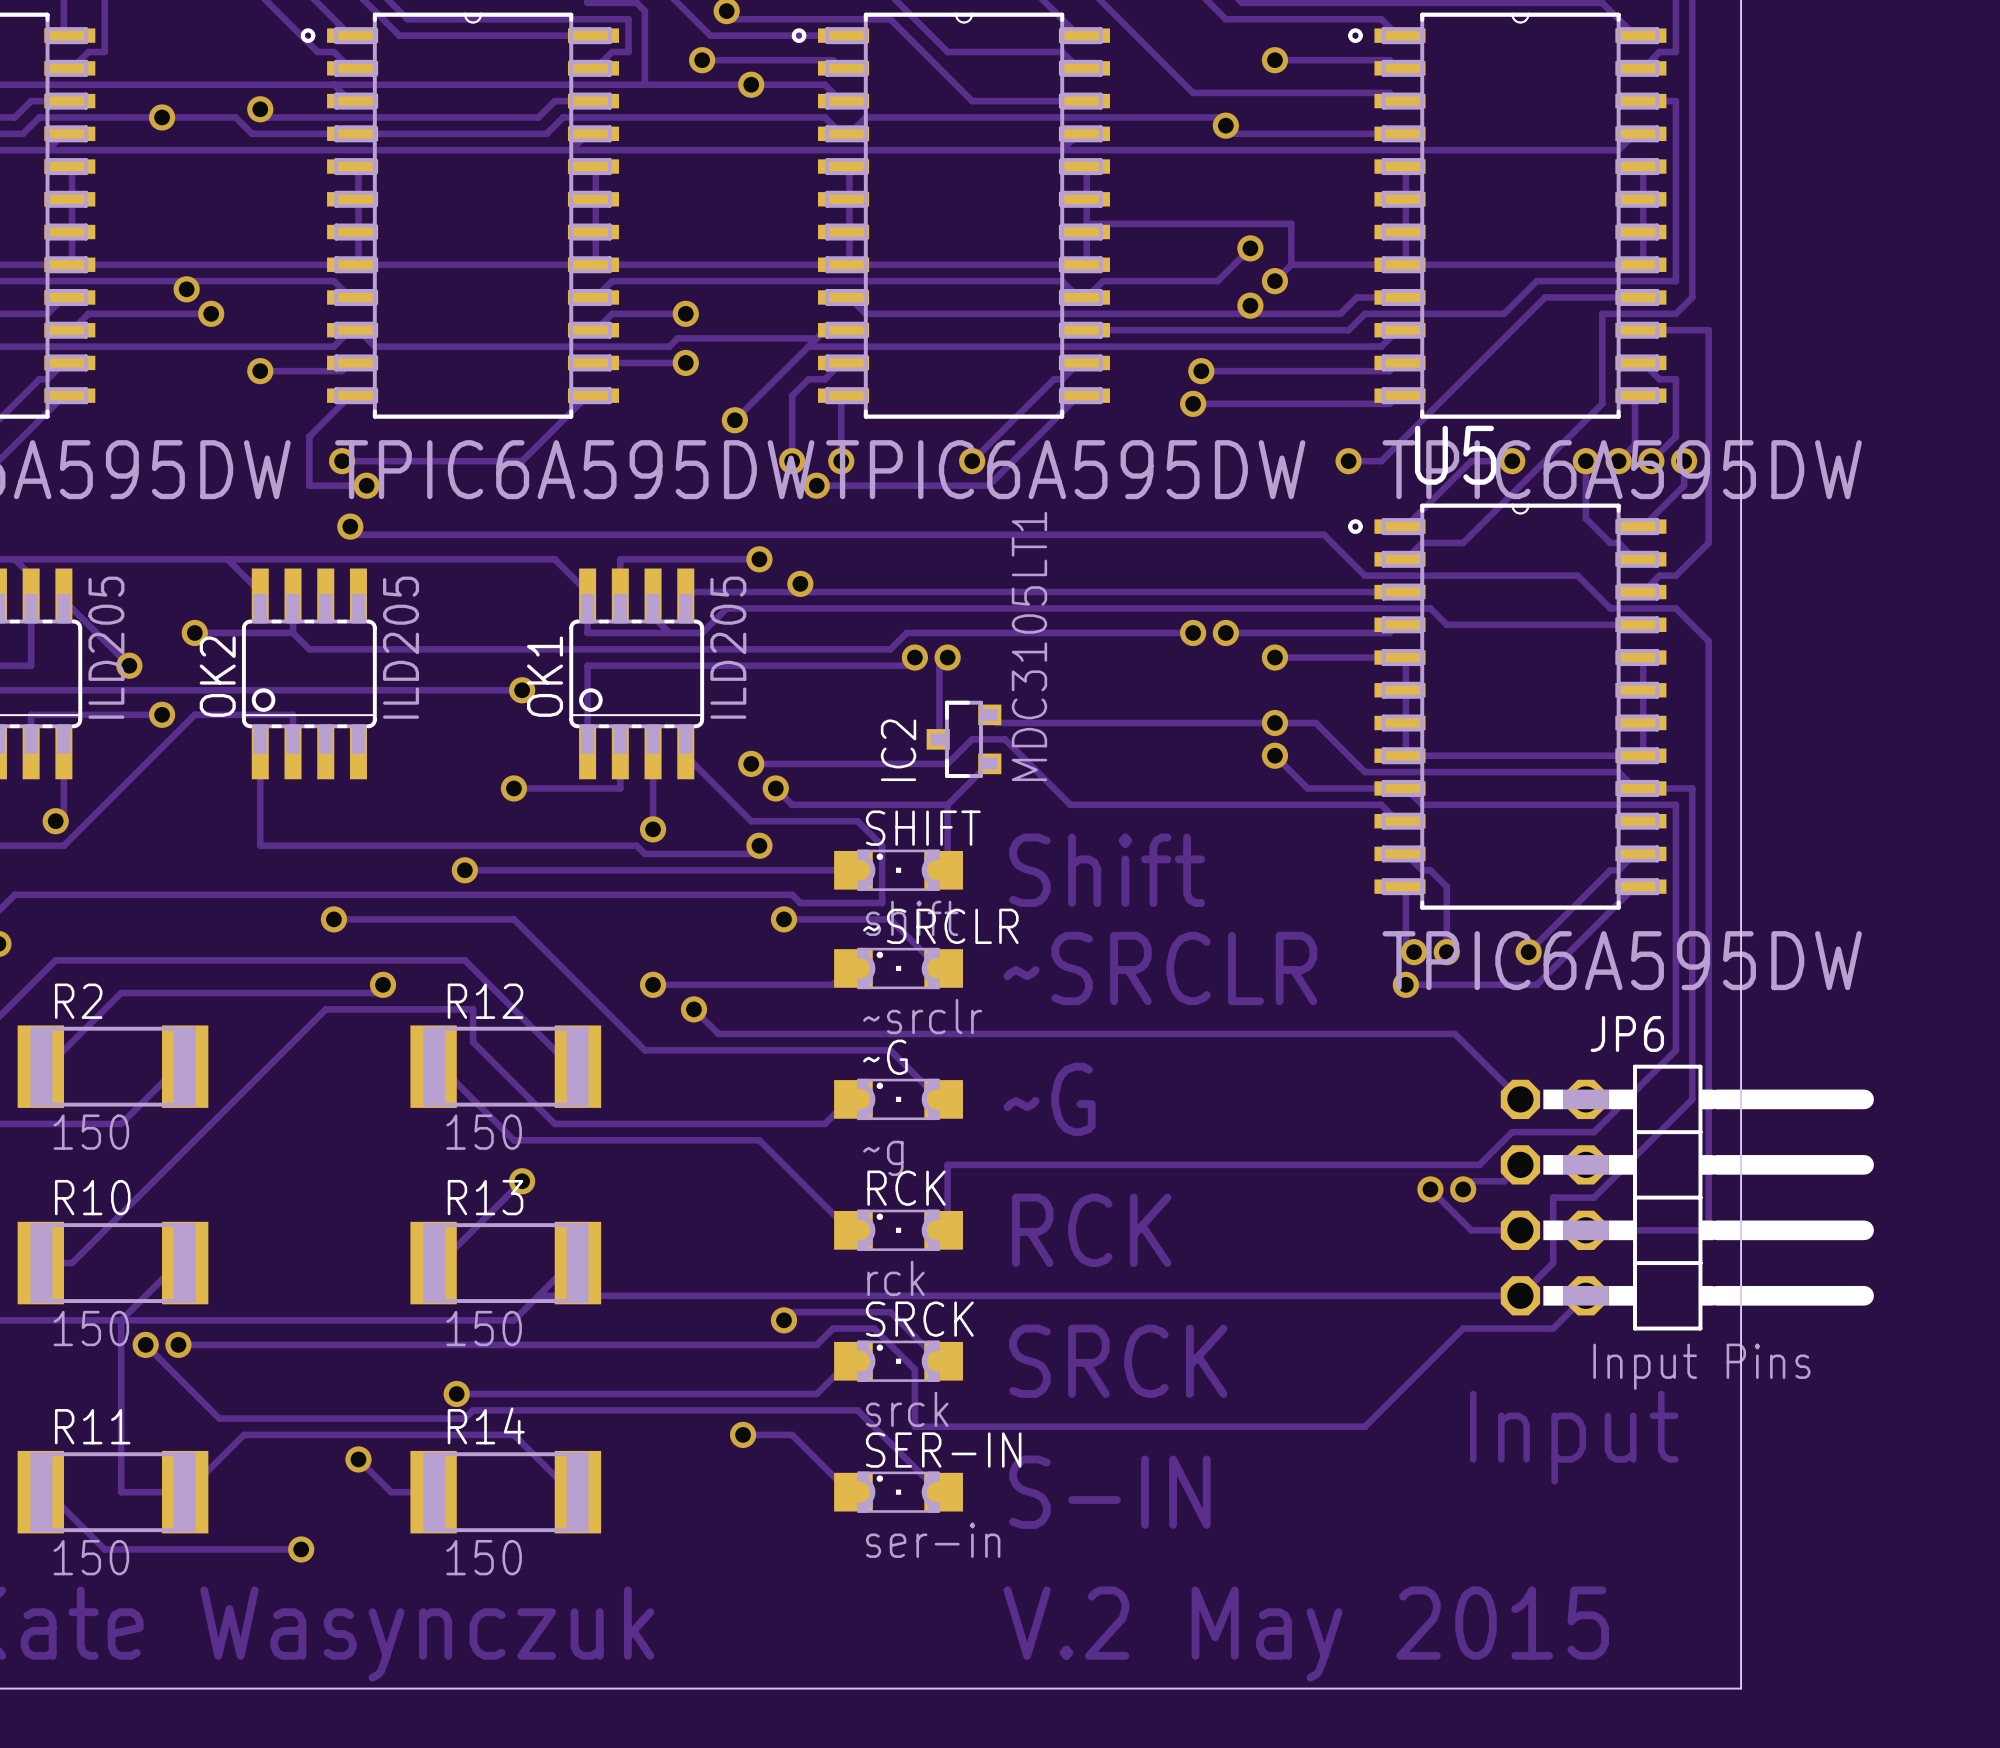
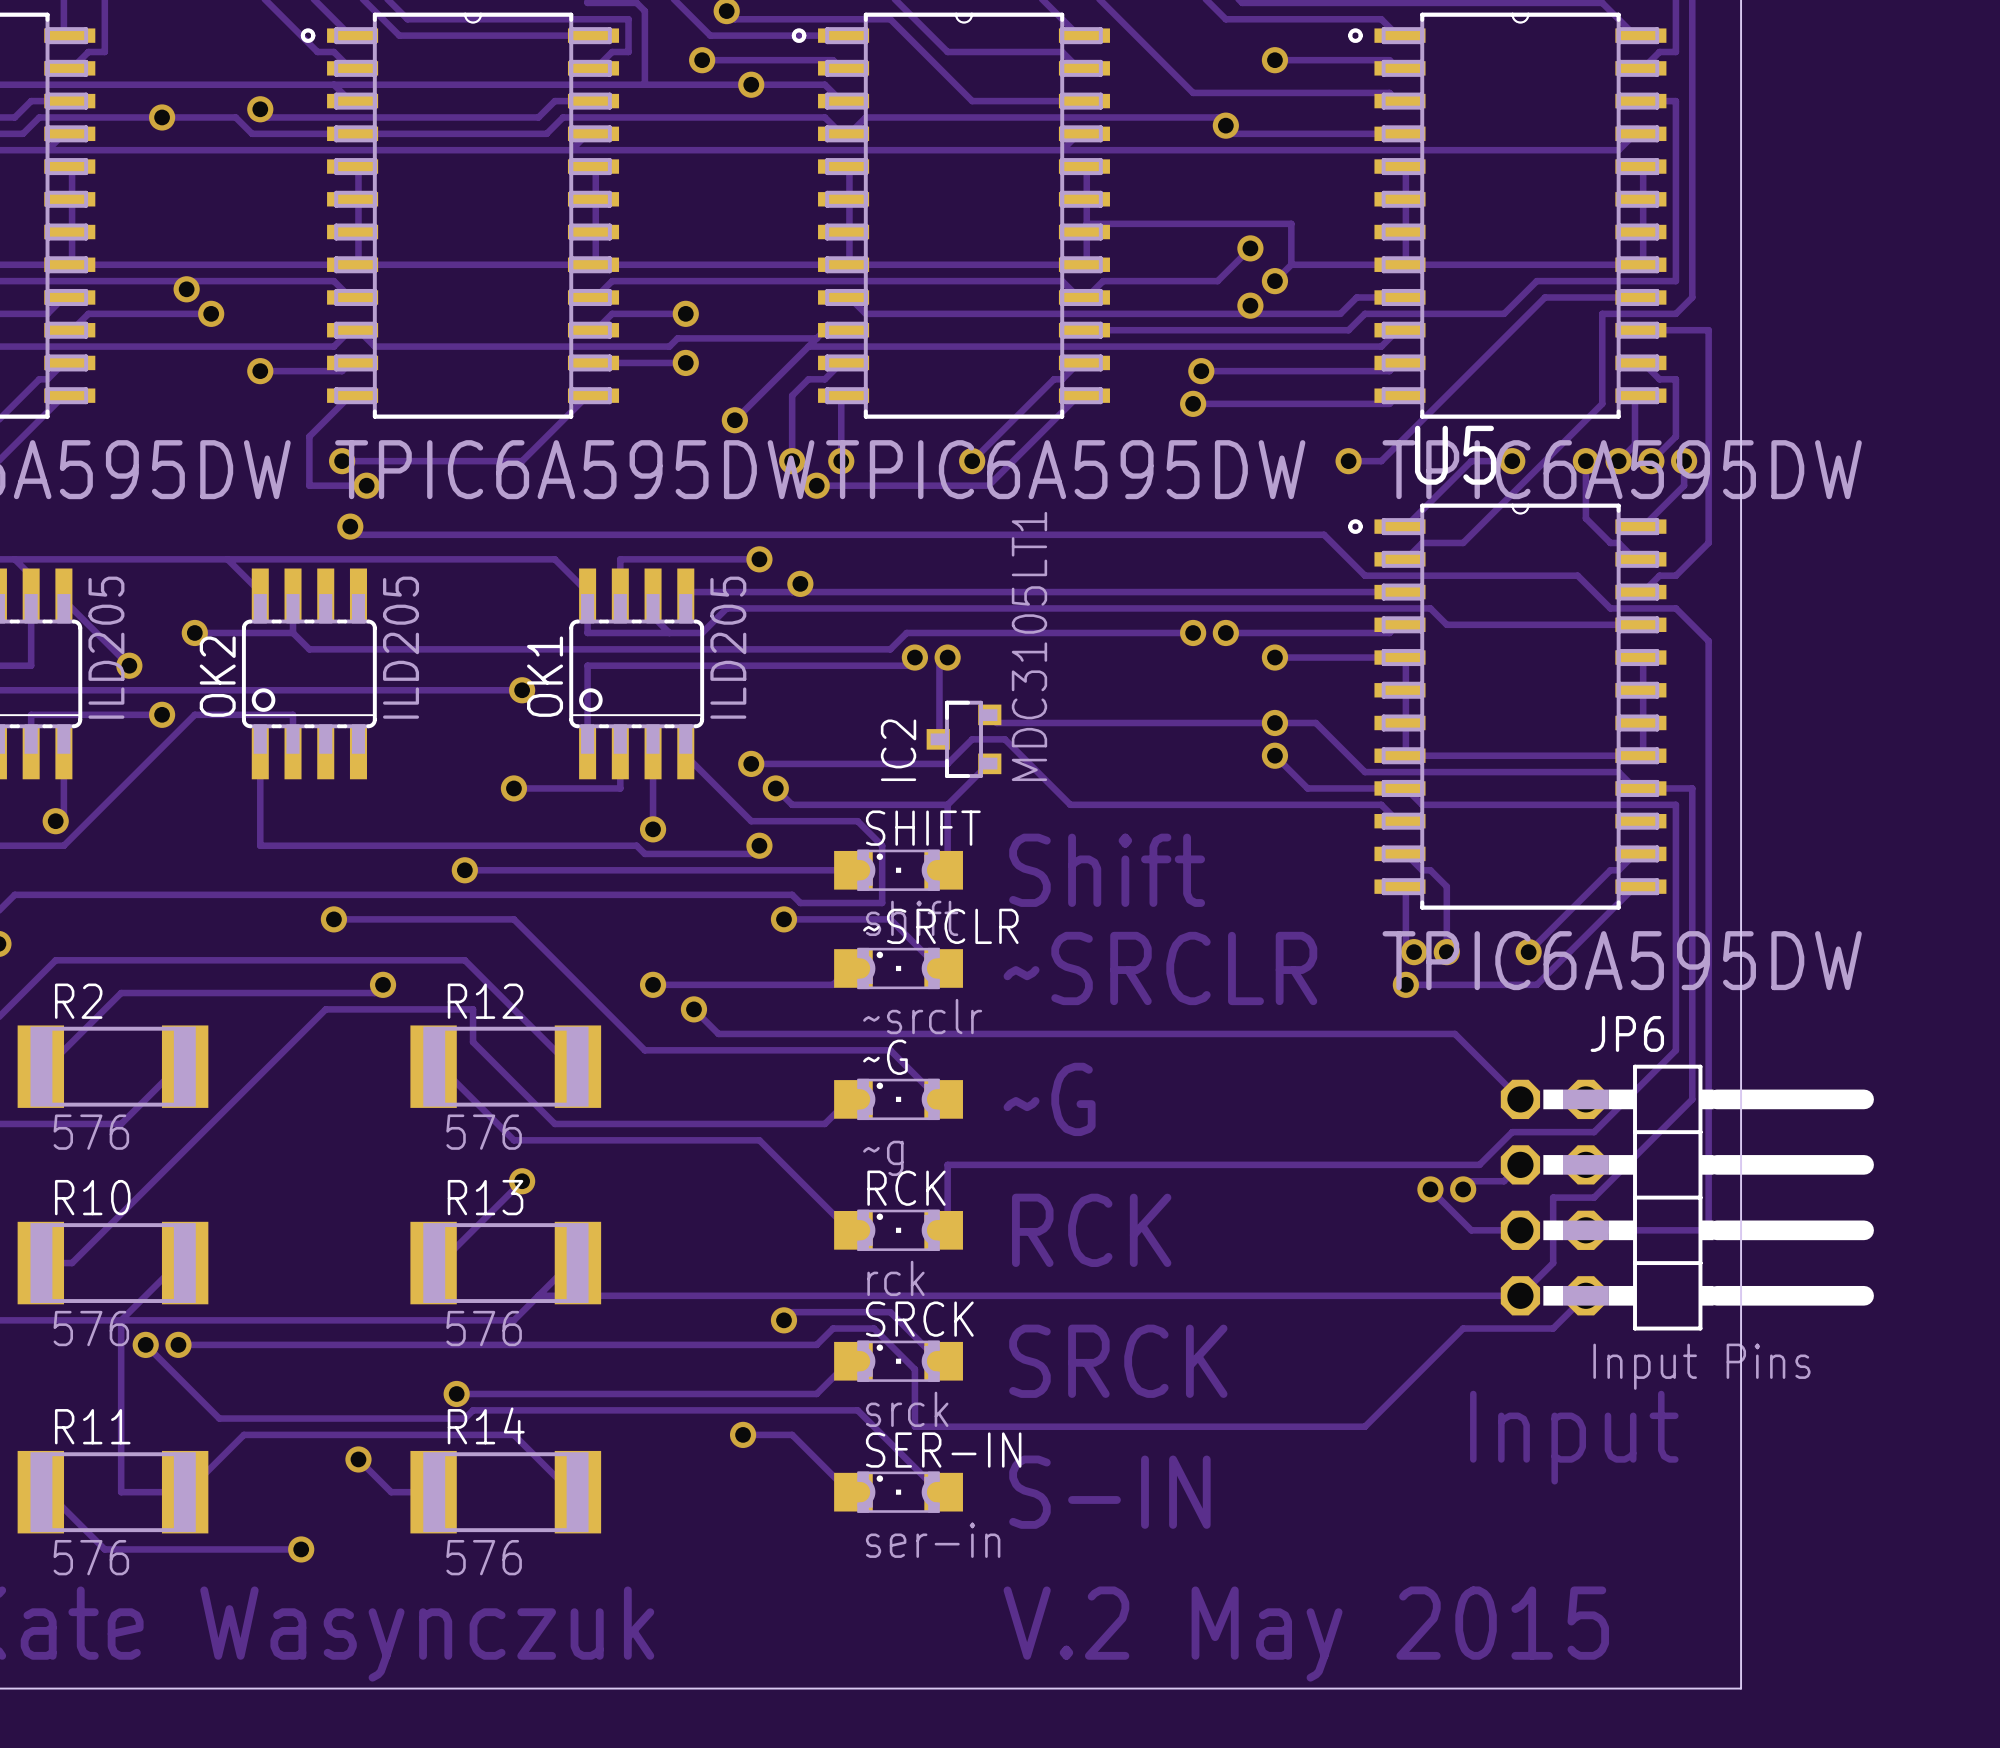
R2 value: 150 (91, 1132) -> 576 (91, 1132)
R12 value: 150 (484, 1132) -> 576 (484, 1132)
R10 value: 150 (91, 1328) -> 576 (91, 1328)
R13 value: 150 (484, 1328) -> 576 (484, 1328)
R11 value: 150 (91, 1557) -> 576 (91, 1557)
R14 value: 150 (484, 1557) -> 576 (484, 1557)

